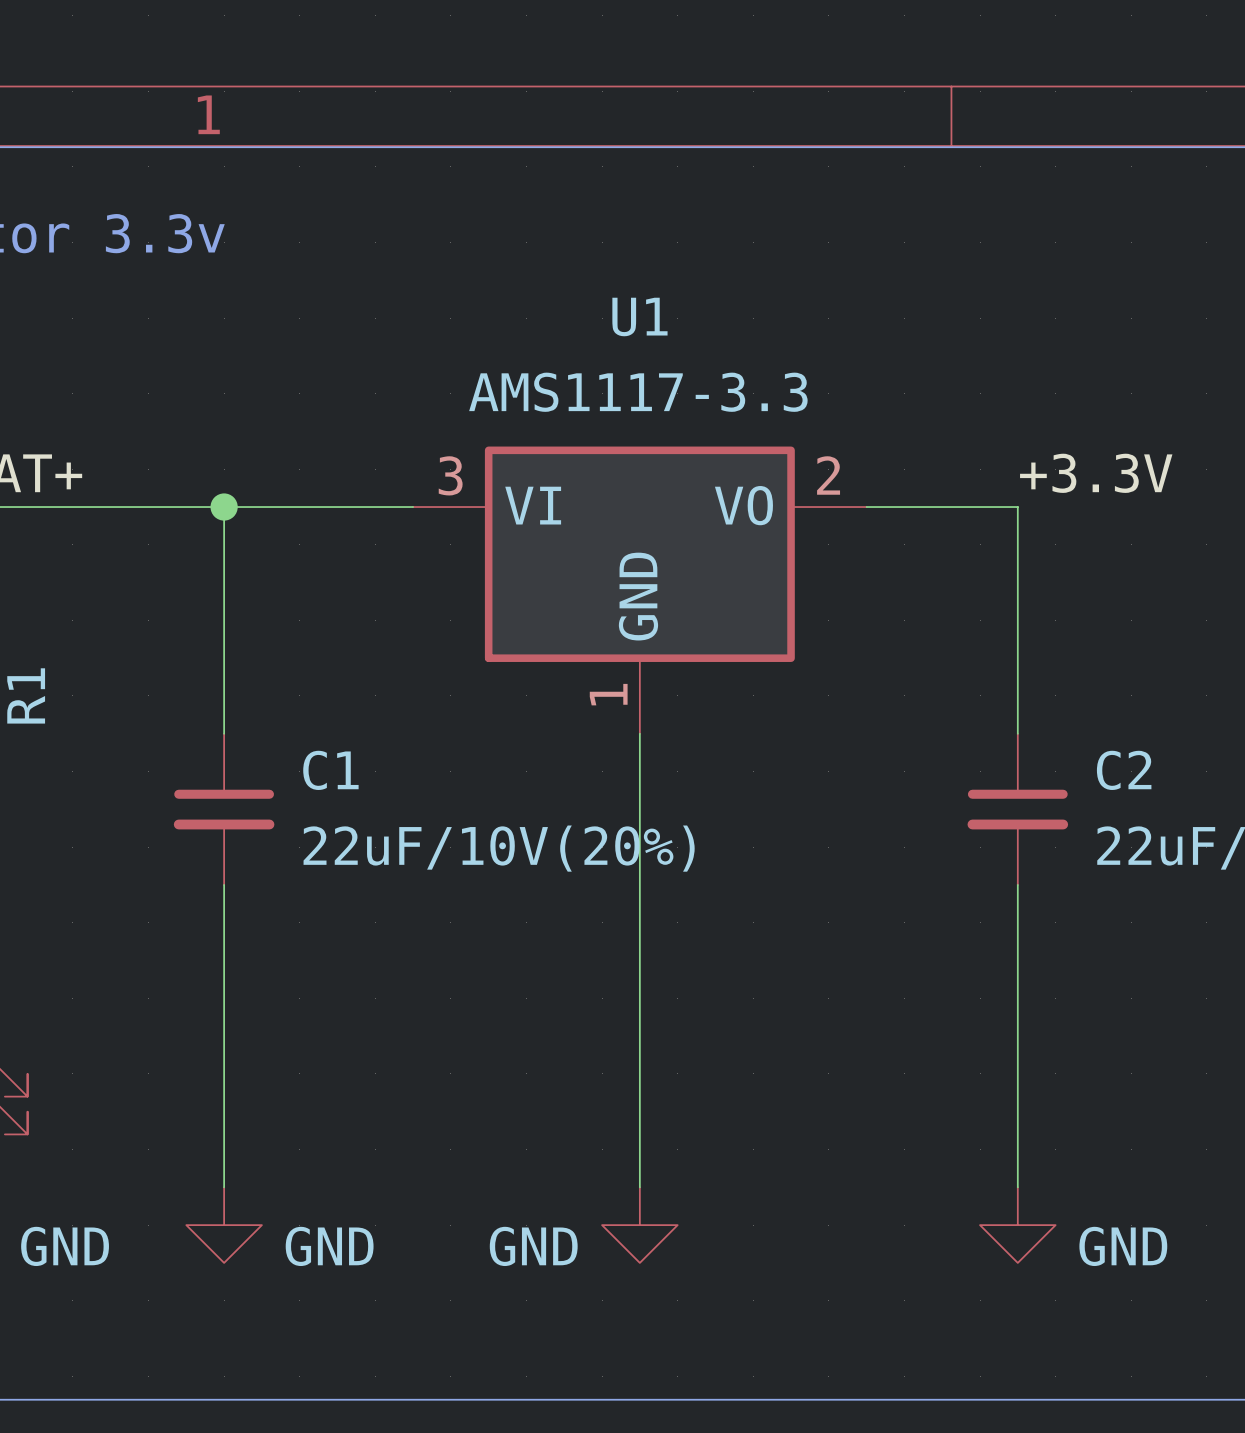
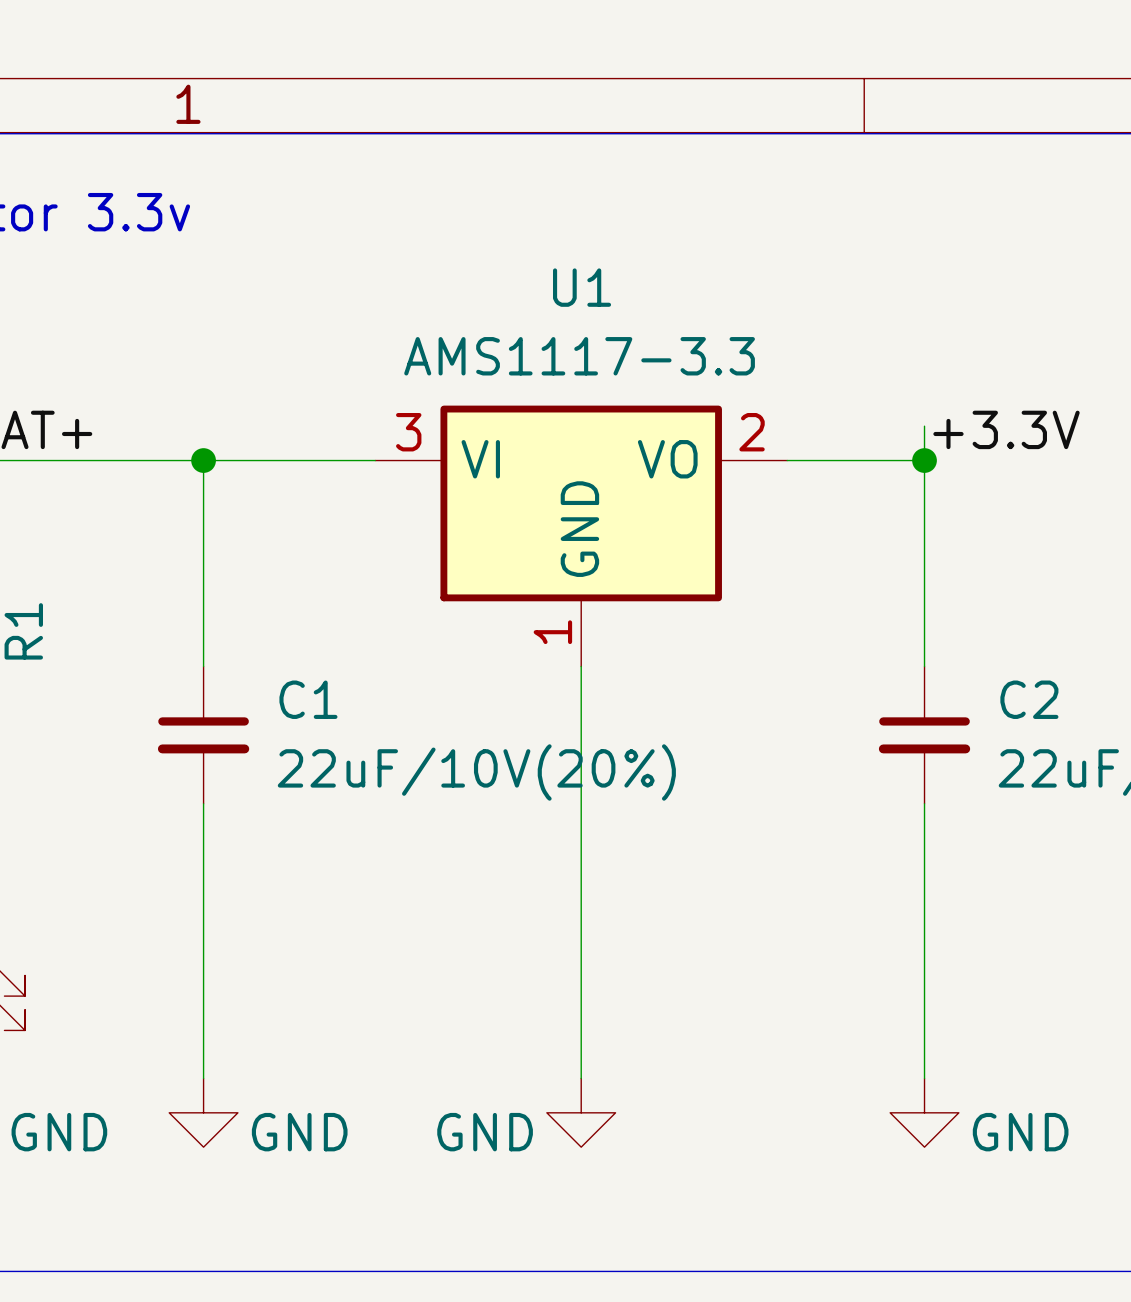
wire: none -> (924, 426) (924, 460)
junction: none -> (924, 460)

